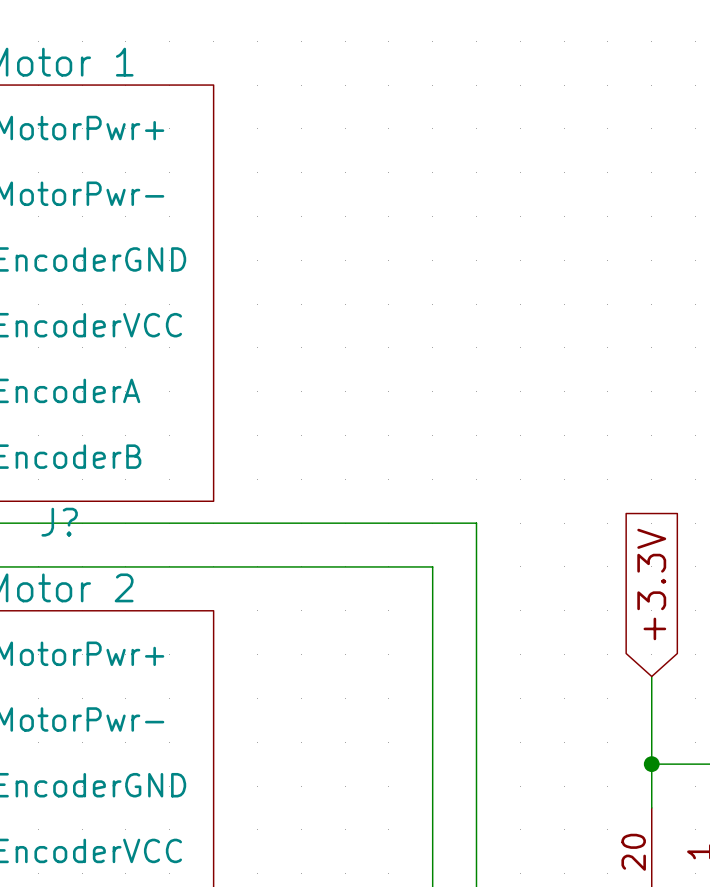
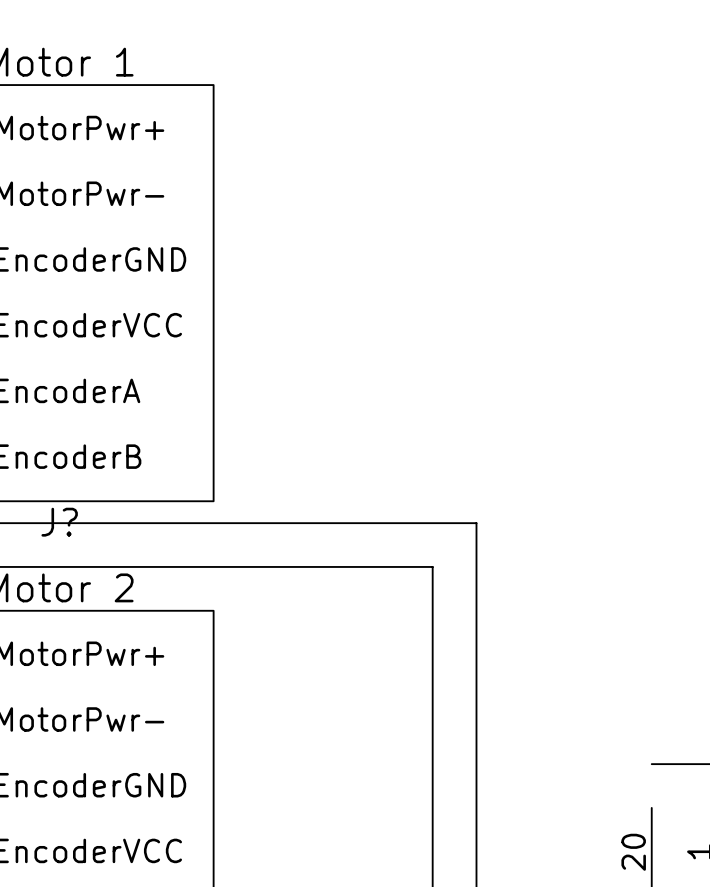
global label: +3.3V (651, 584) -> none
wire: (651, 676) (651, 807) -> none
junction: (651, 764) -> none

